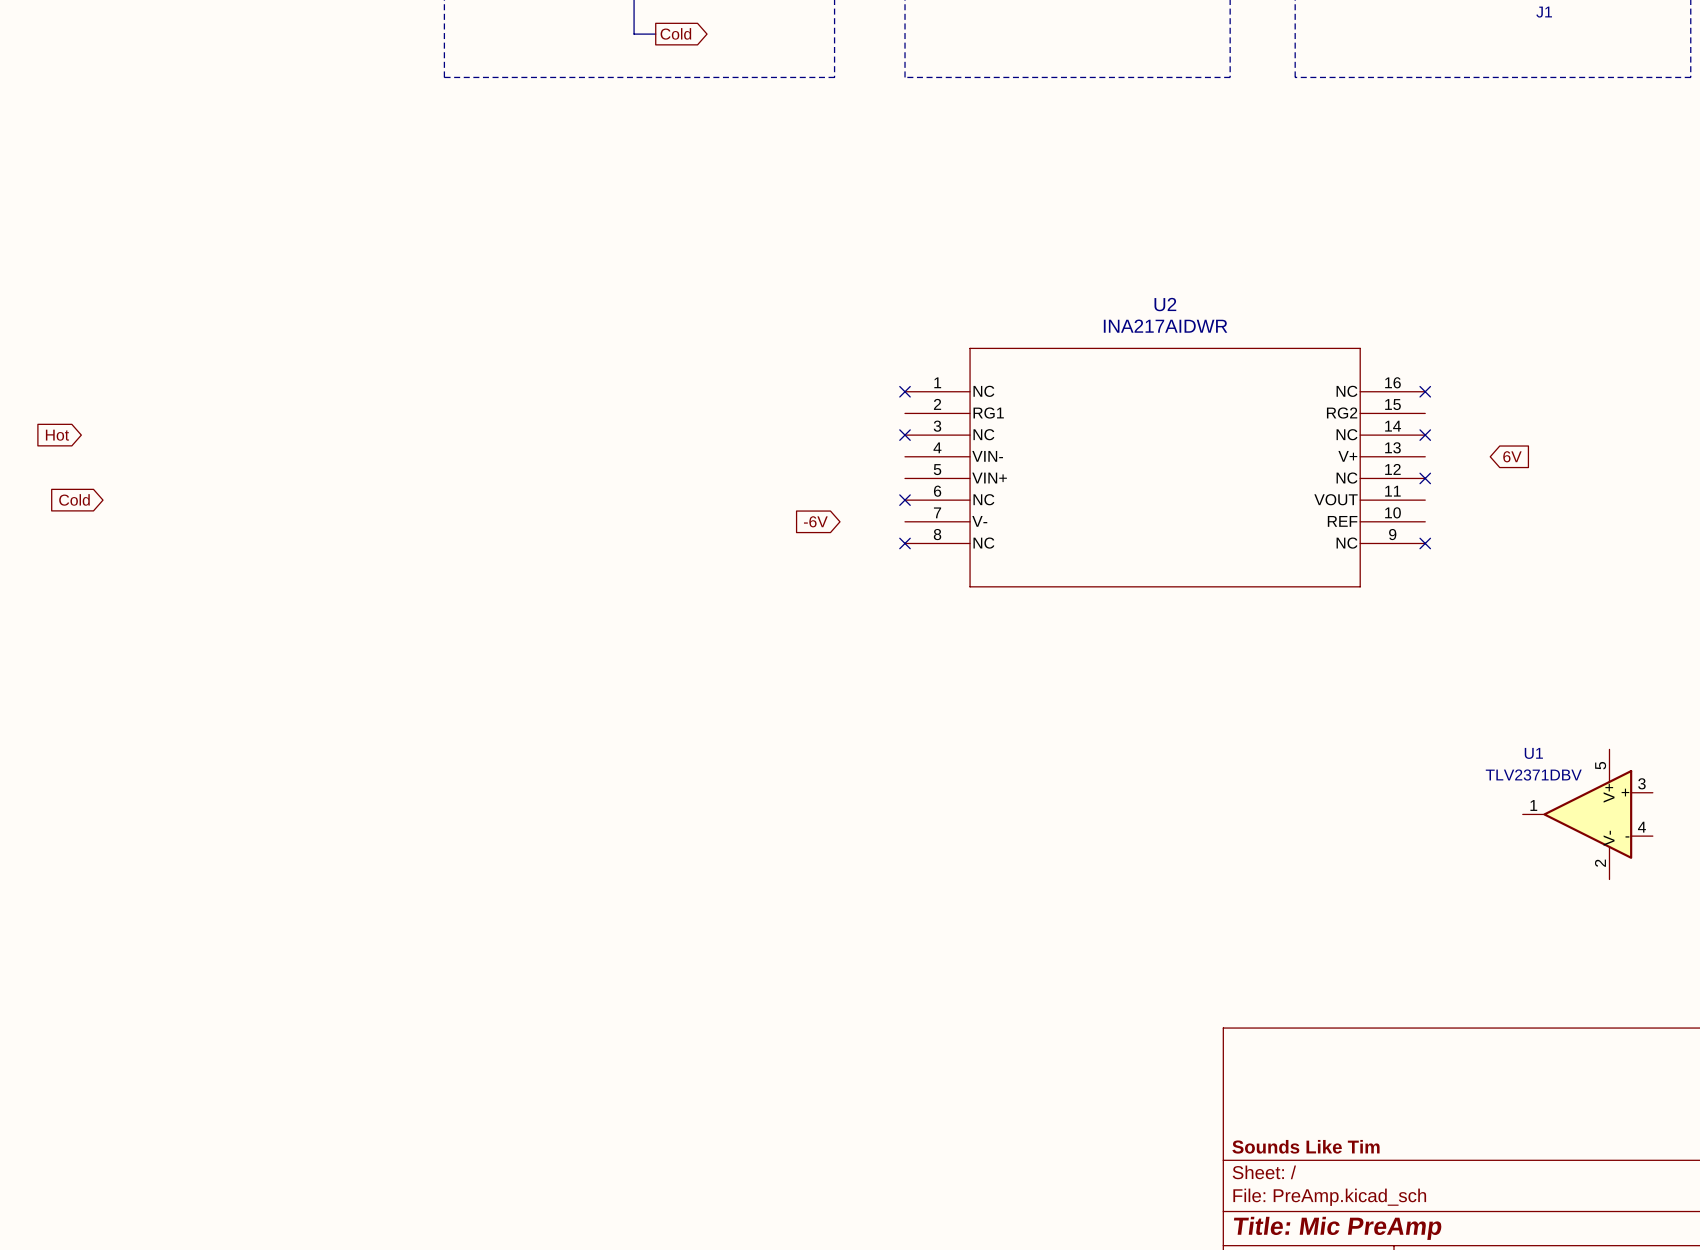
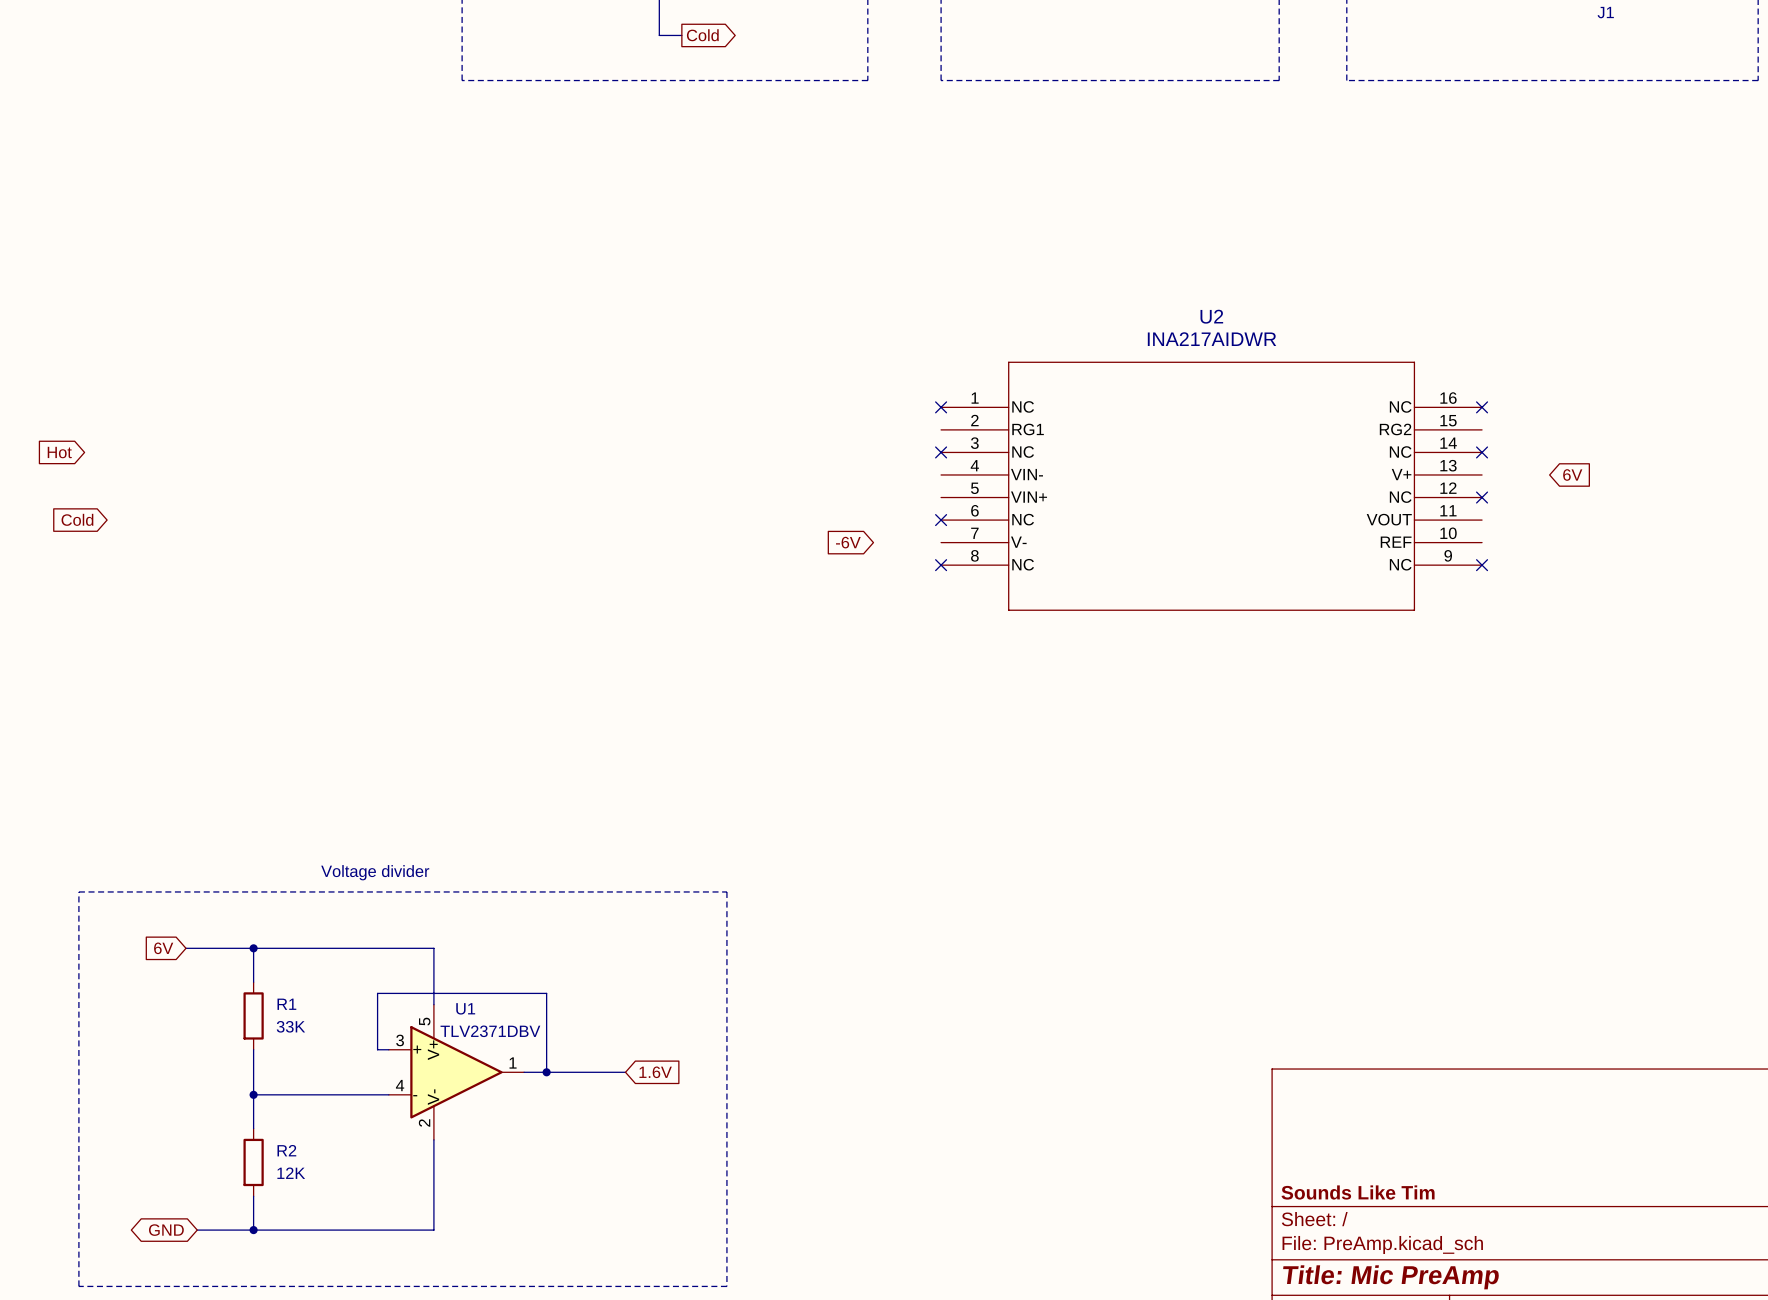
U1 name position: U1 (1533, 753) -> U1 (465, 1008)
U1 value position: TLV2371DBV (1533, 775) -> TLV2371DBV (490, 1031)
U1 flip: as is (1587, 814) -> left-right (456, 1072)
U1 position: (1587, 814) -> (456, 1072)
text: none -> Voltage divider (375, 872)
line: none -> (78, 891) (726, 891) (726, 1286) (78, 1286) (78, 891)
global label: none -> 6V (163, 948)
wire: none -> (185, 948) (433, 948) (433, 1004)
wire: none -> (253, 948) (253, 982)
junction: none -> (253, 948)
R1: none -> 33K (253, 1015)
wire: none -> (253, 1049) (253, 1128)
wire: none -> (388, 1049) (377, 1049) (377, 993) (546, 993) (546, 1072)
wire: none -> (524, 1072) (625, 1072)
junction: none -> (546, 1072)
global label: none -> 1.6V (655, 1072)
wire: none -> (253, 1094) (388, 1094)
junction: none -> (253, 1094)
wire: none -> (433, 1139) (433, 1230) (197, 1230)
R2: none -> 12K (253, 1162)
wire: none -> (253, 1196) (253, 1230)
global label: none -> GND (166, 1230)
junction: none -> (253, 1230)

